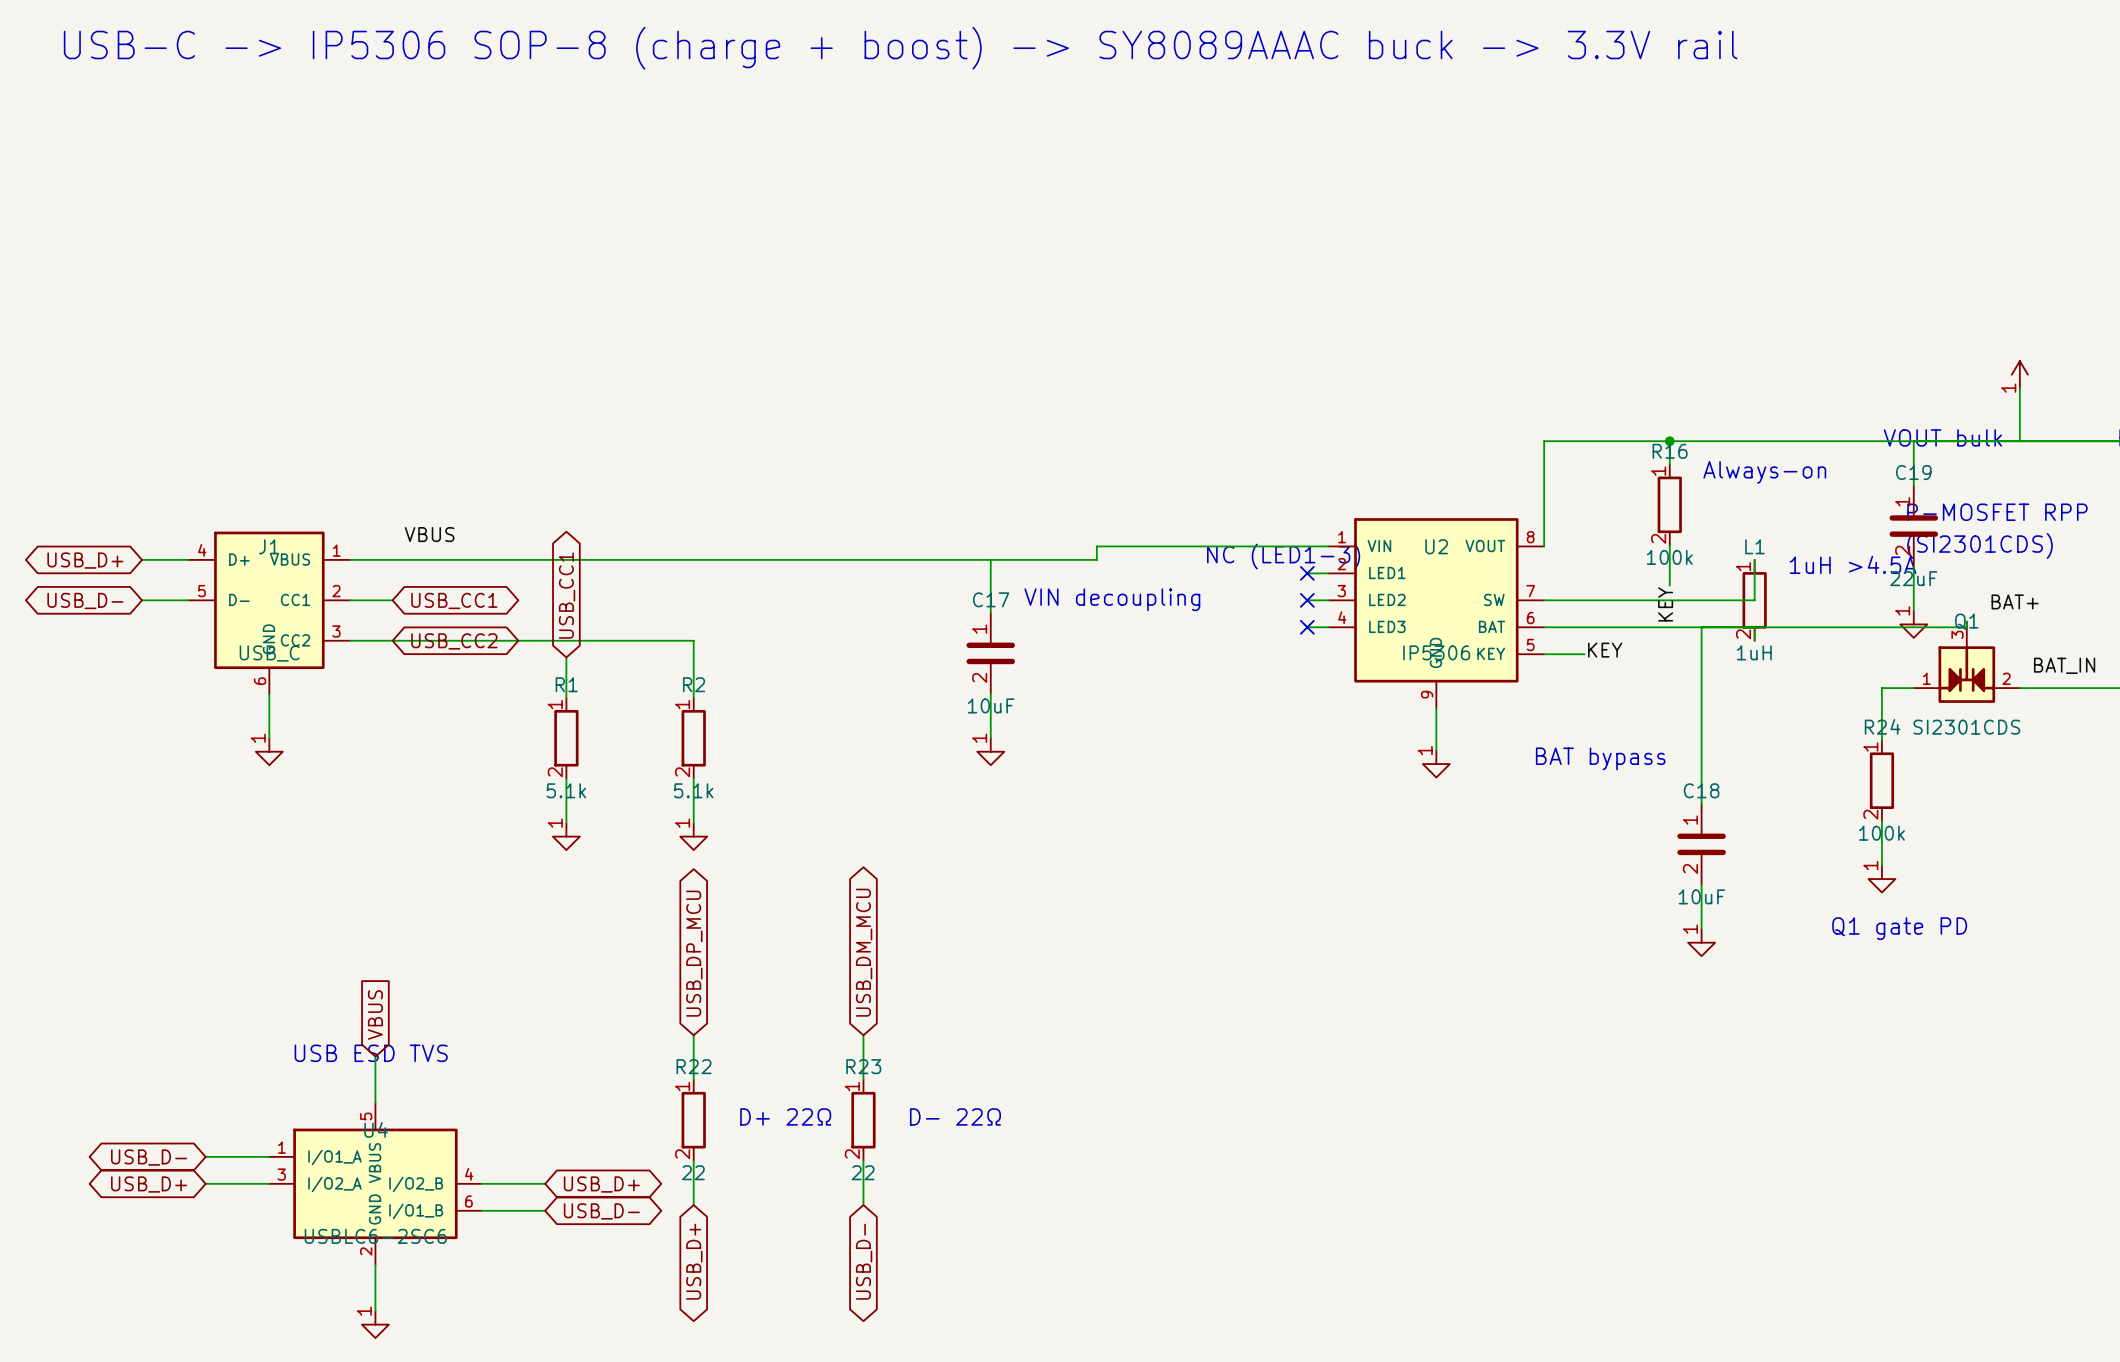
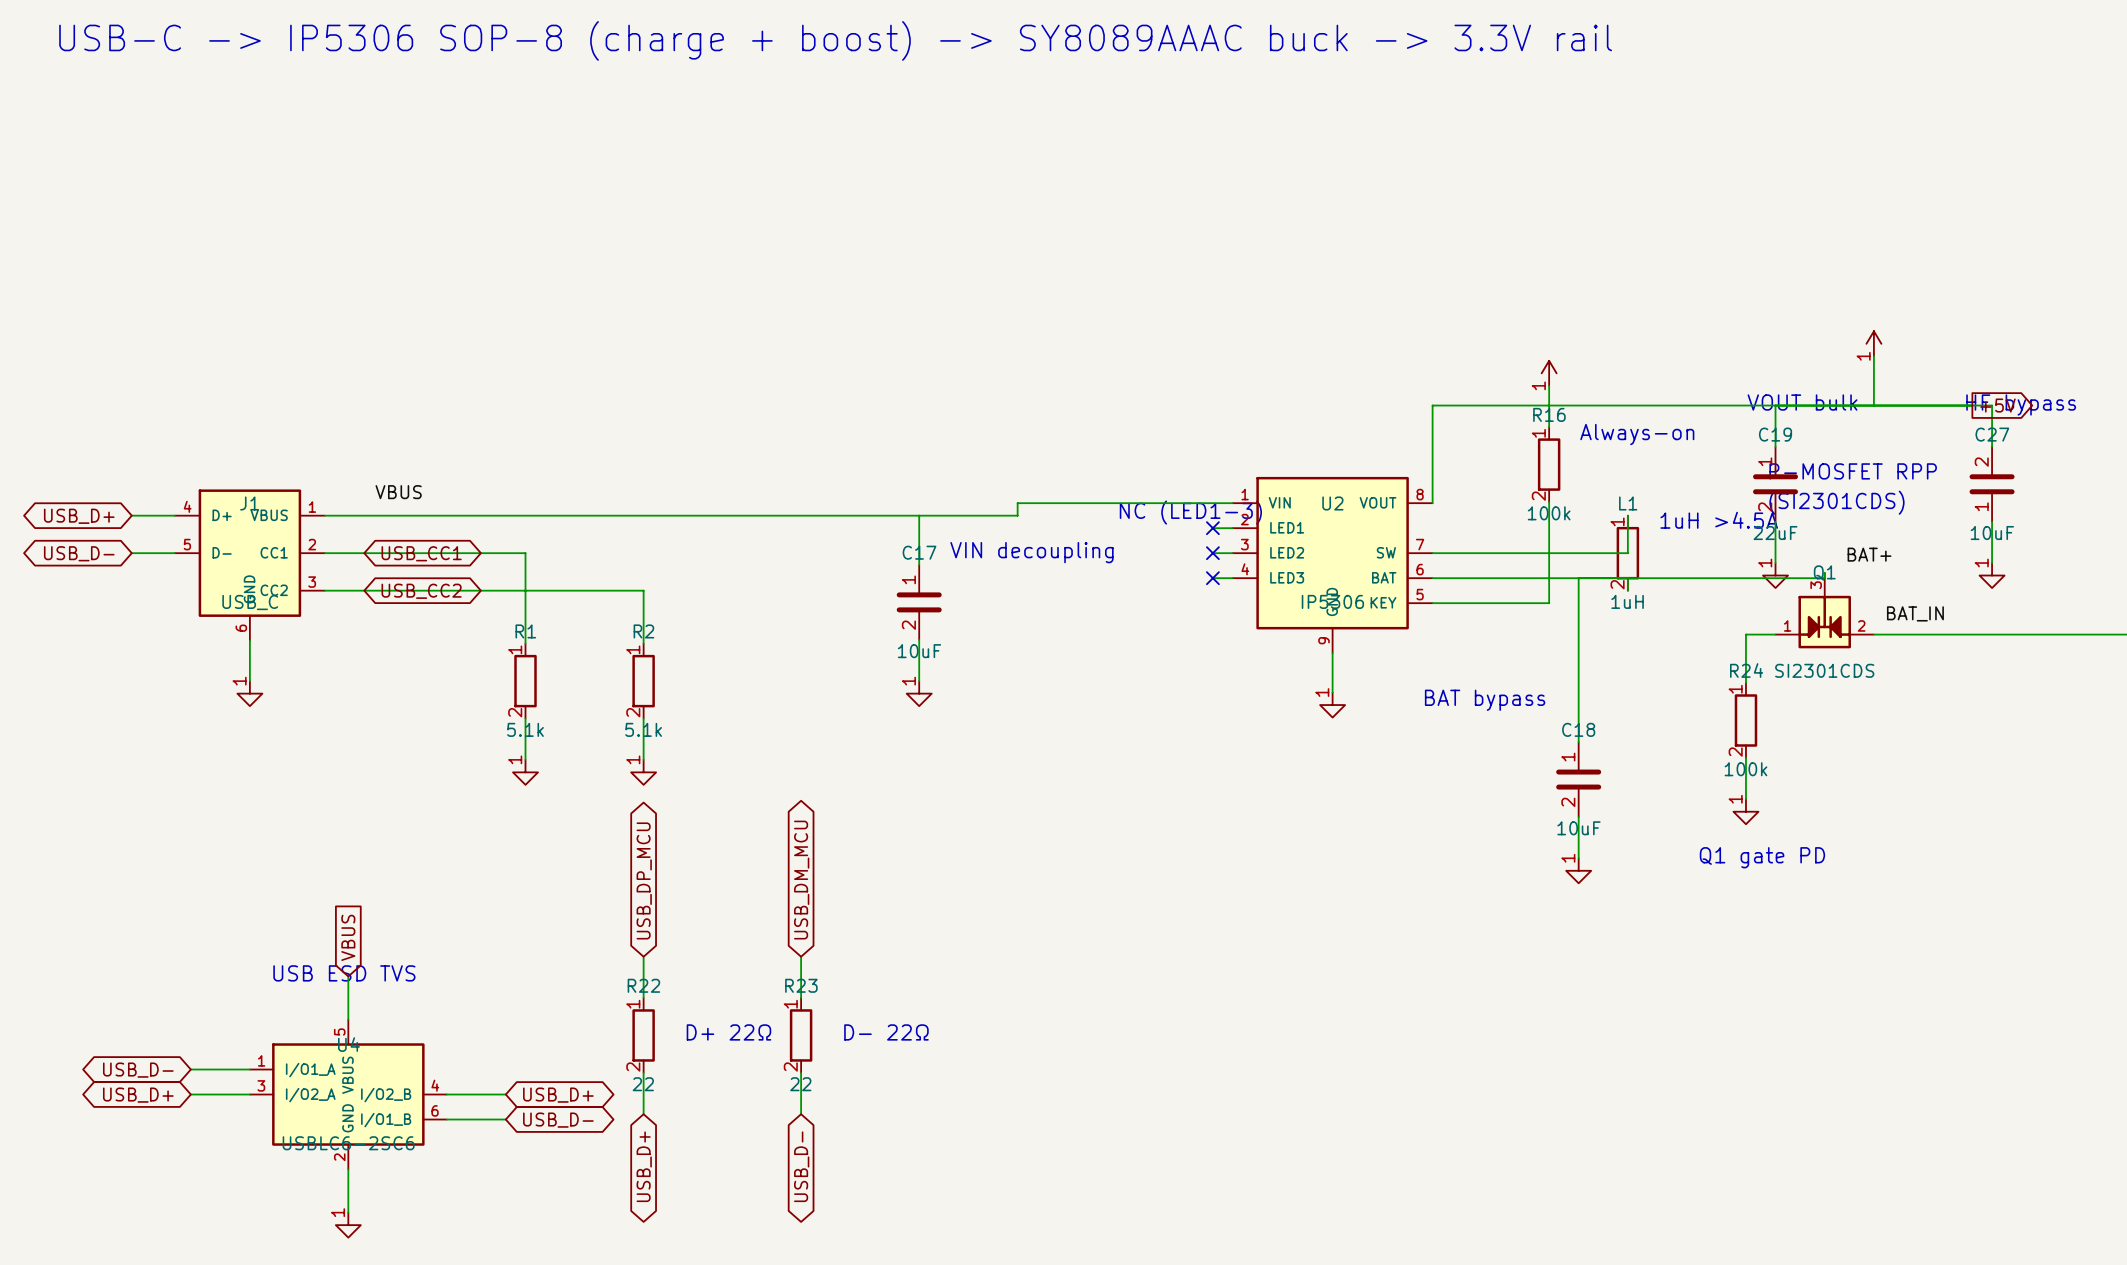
power symbol: none -> (1549, 373)
wire: none -> (1549, 385) (1549, 405)
junction: (1669, 441) -> none
wire: none -> (1549, 539) (1549, 603) (1470, 603)
global label: USB_CC1 (567, 595) -> none
wire: none -> (364, 553) (525, 553) (525, 606)
label: KEY (1665, 604) -> none
label: KEY (1605, 650) -> none

